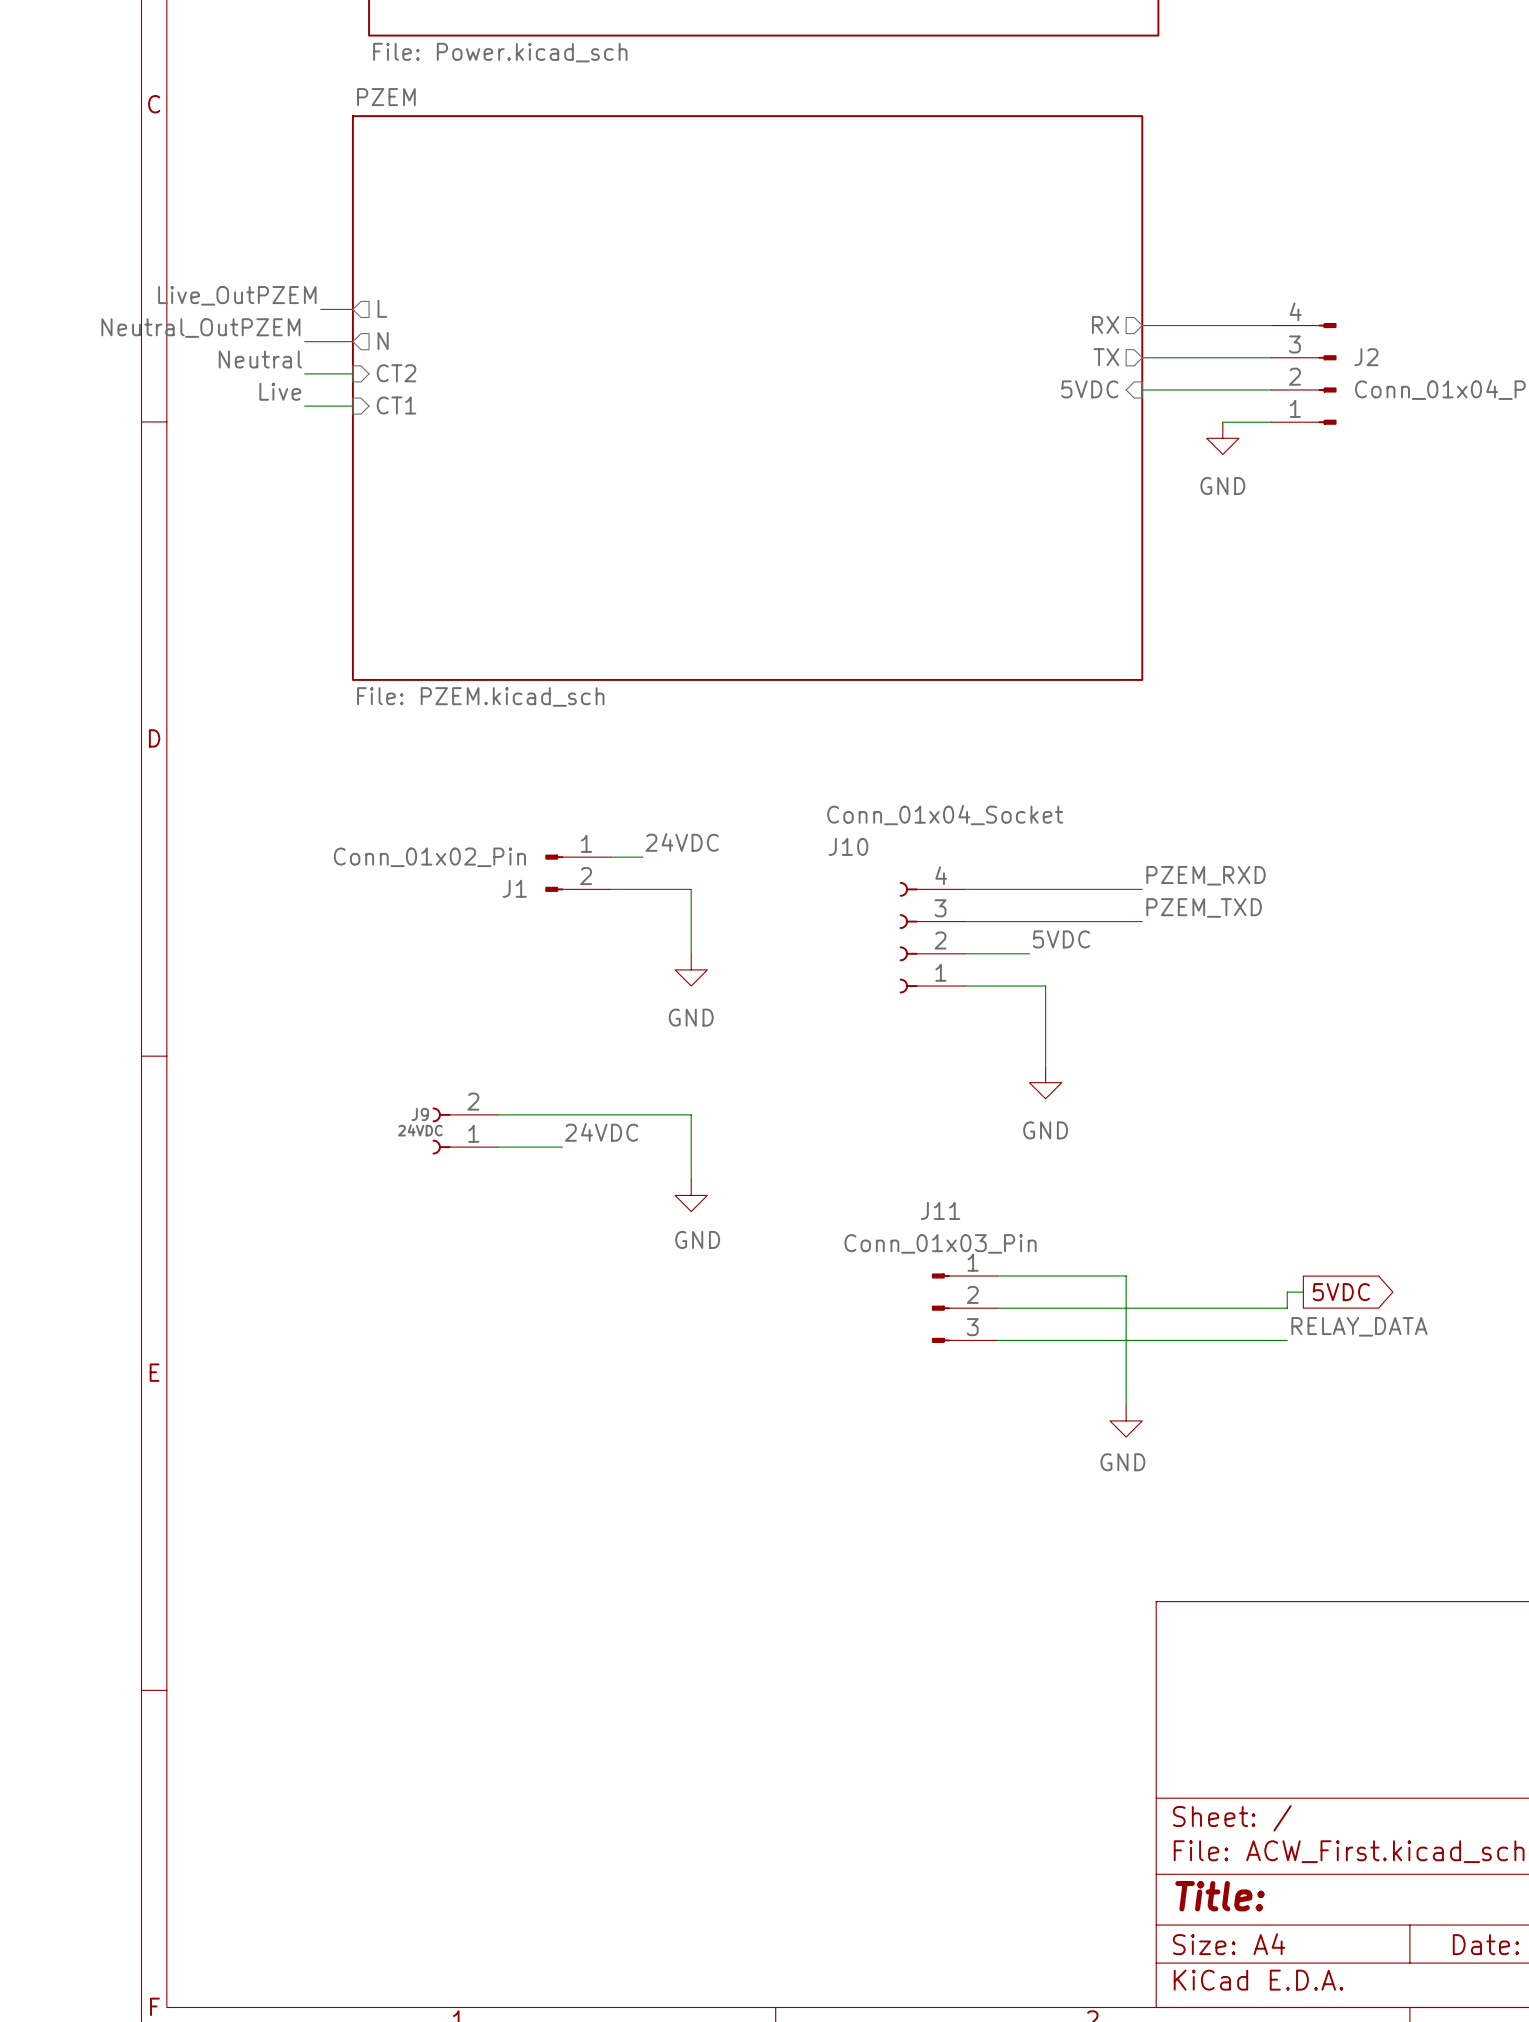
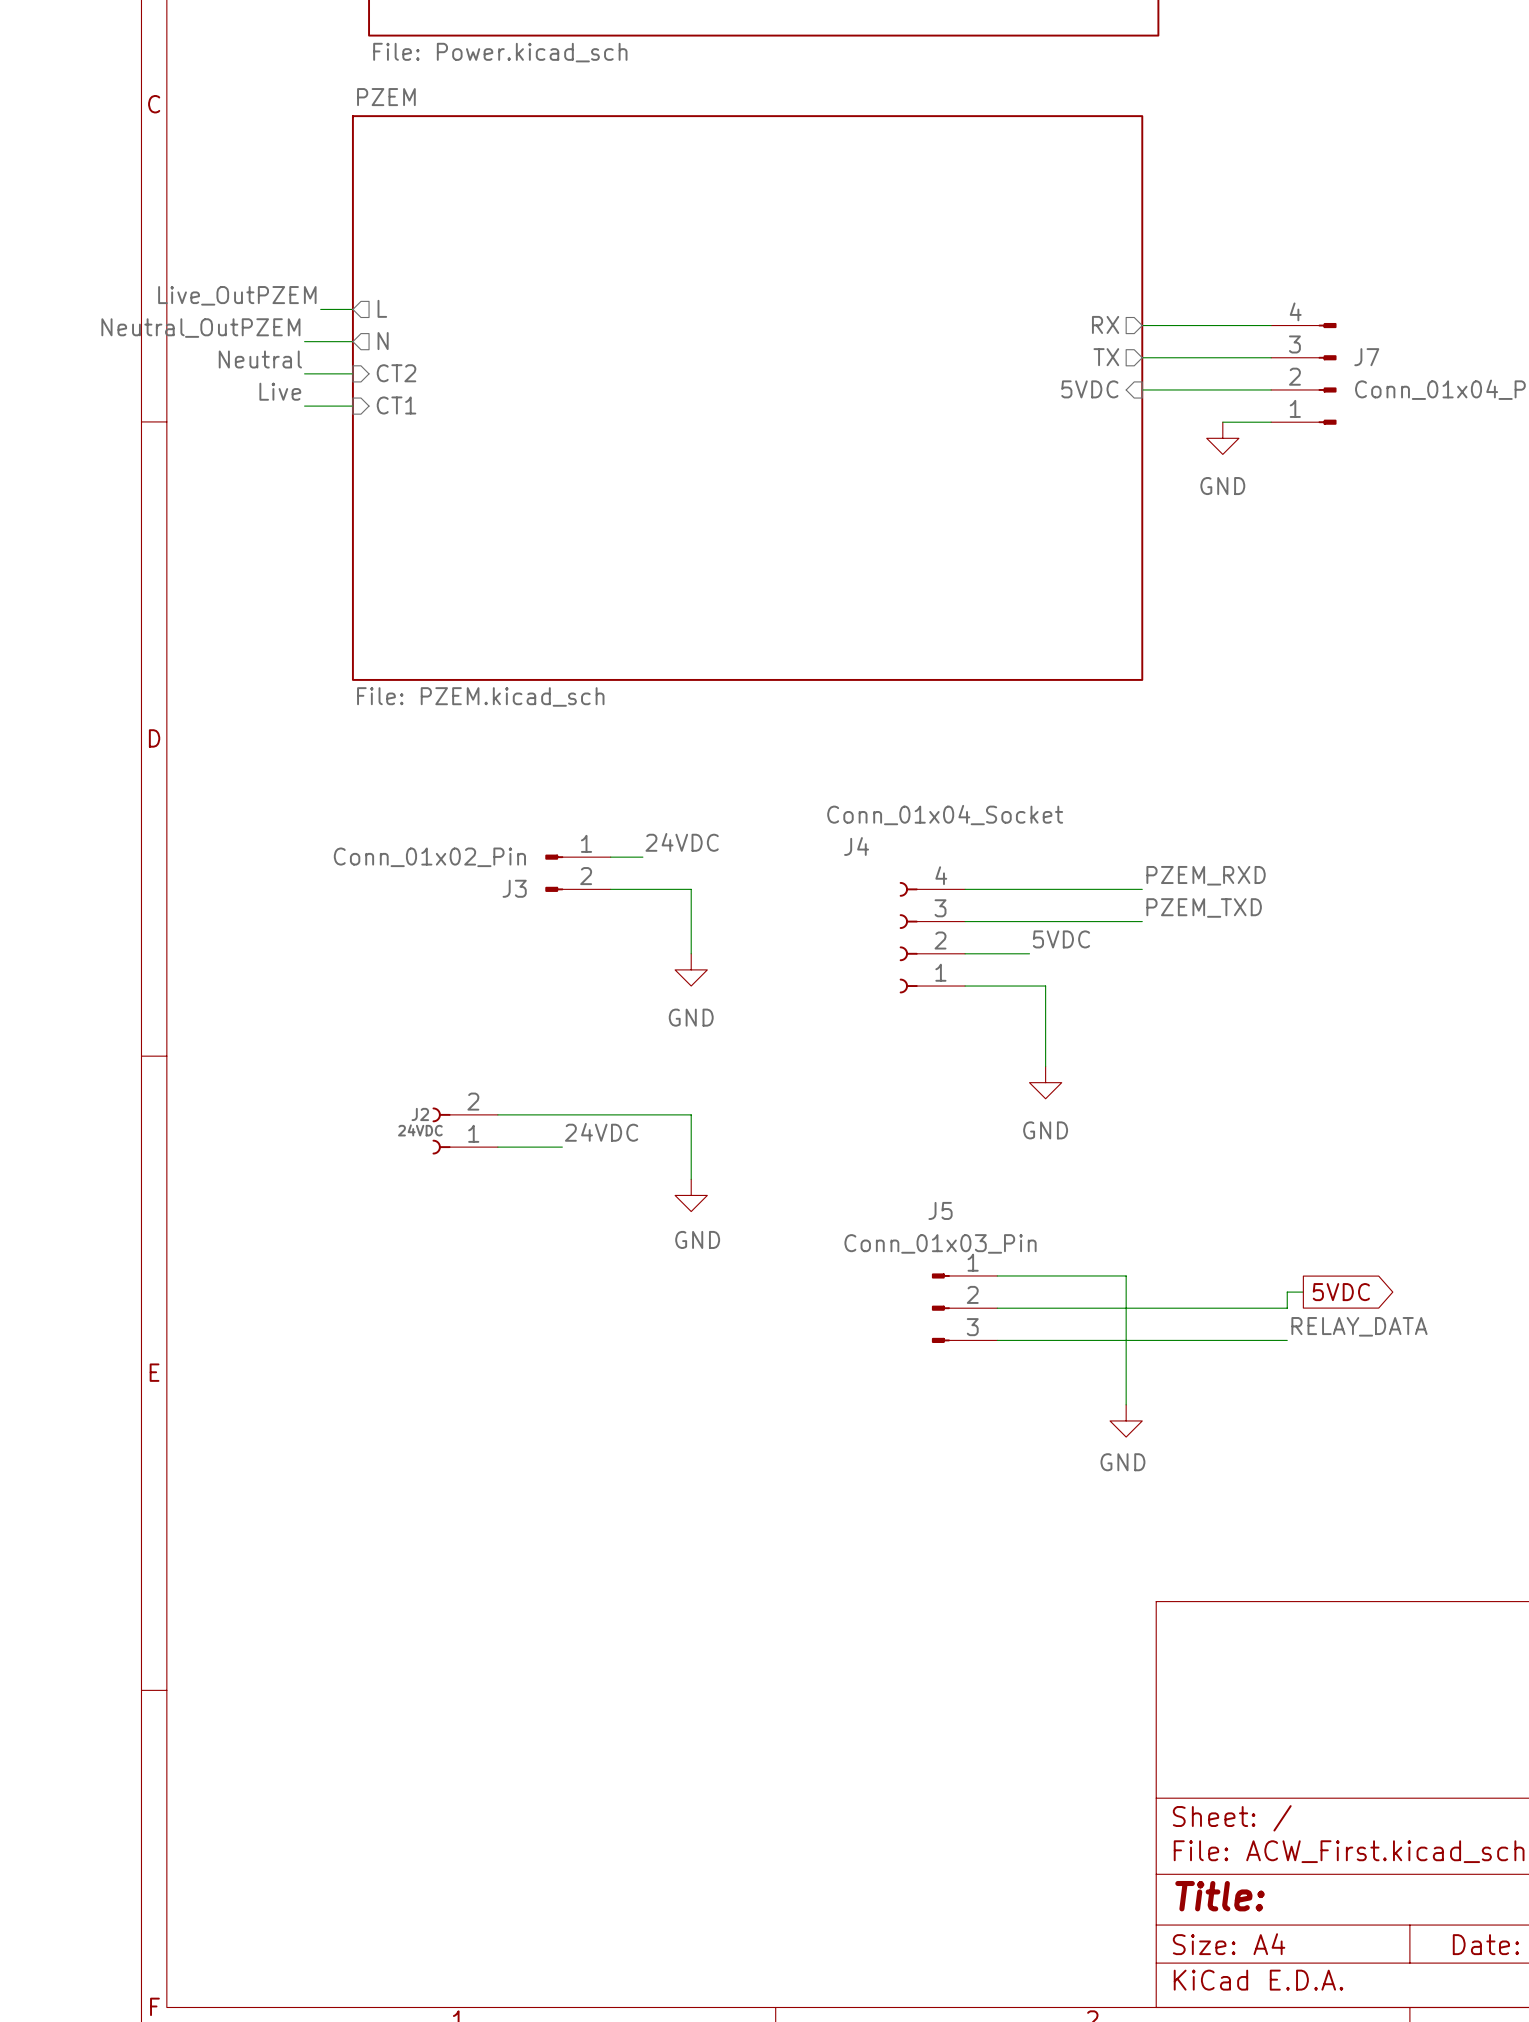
J2 name: J2 (1366, 357) -> J7 (1366, 357)
J10 name: J10 (848, 846) -> J4 (856, 846)
J1 name: J1 (514, 888) -> J3 (514, 888)
J9 name: J9 (420, 1114) -> J2 (420, 1114)
J11 name: J11 (940, 1210) -> J5 (940, 1210)

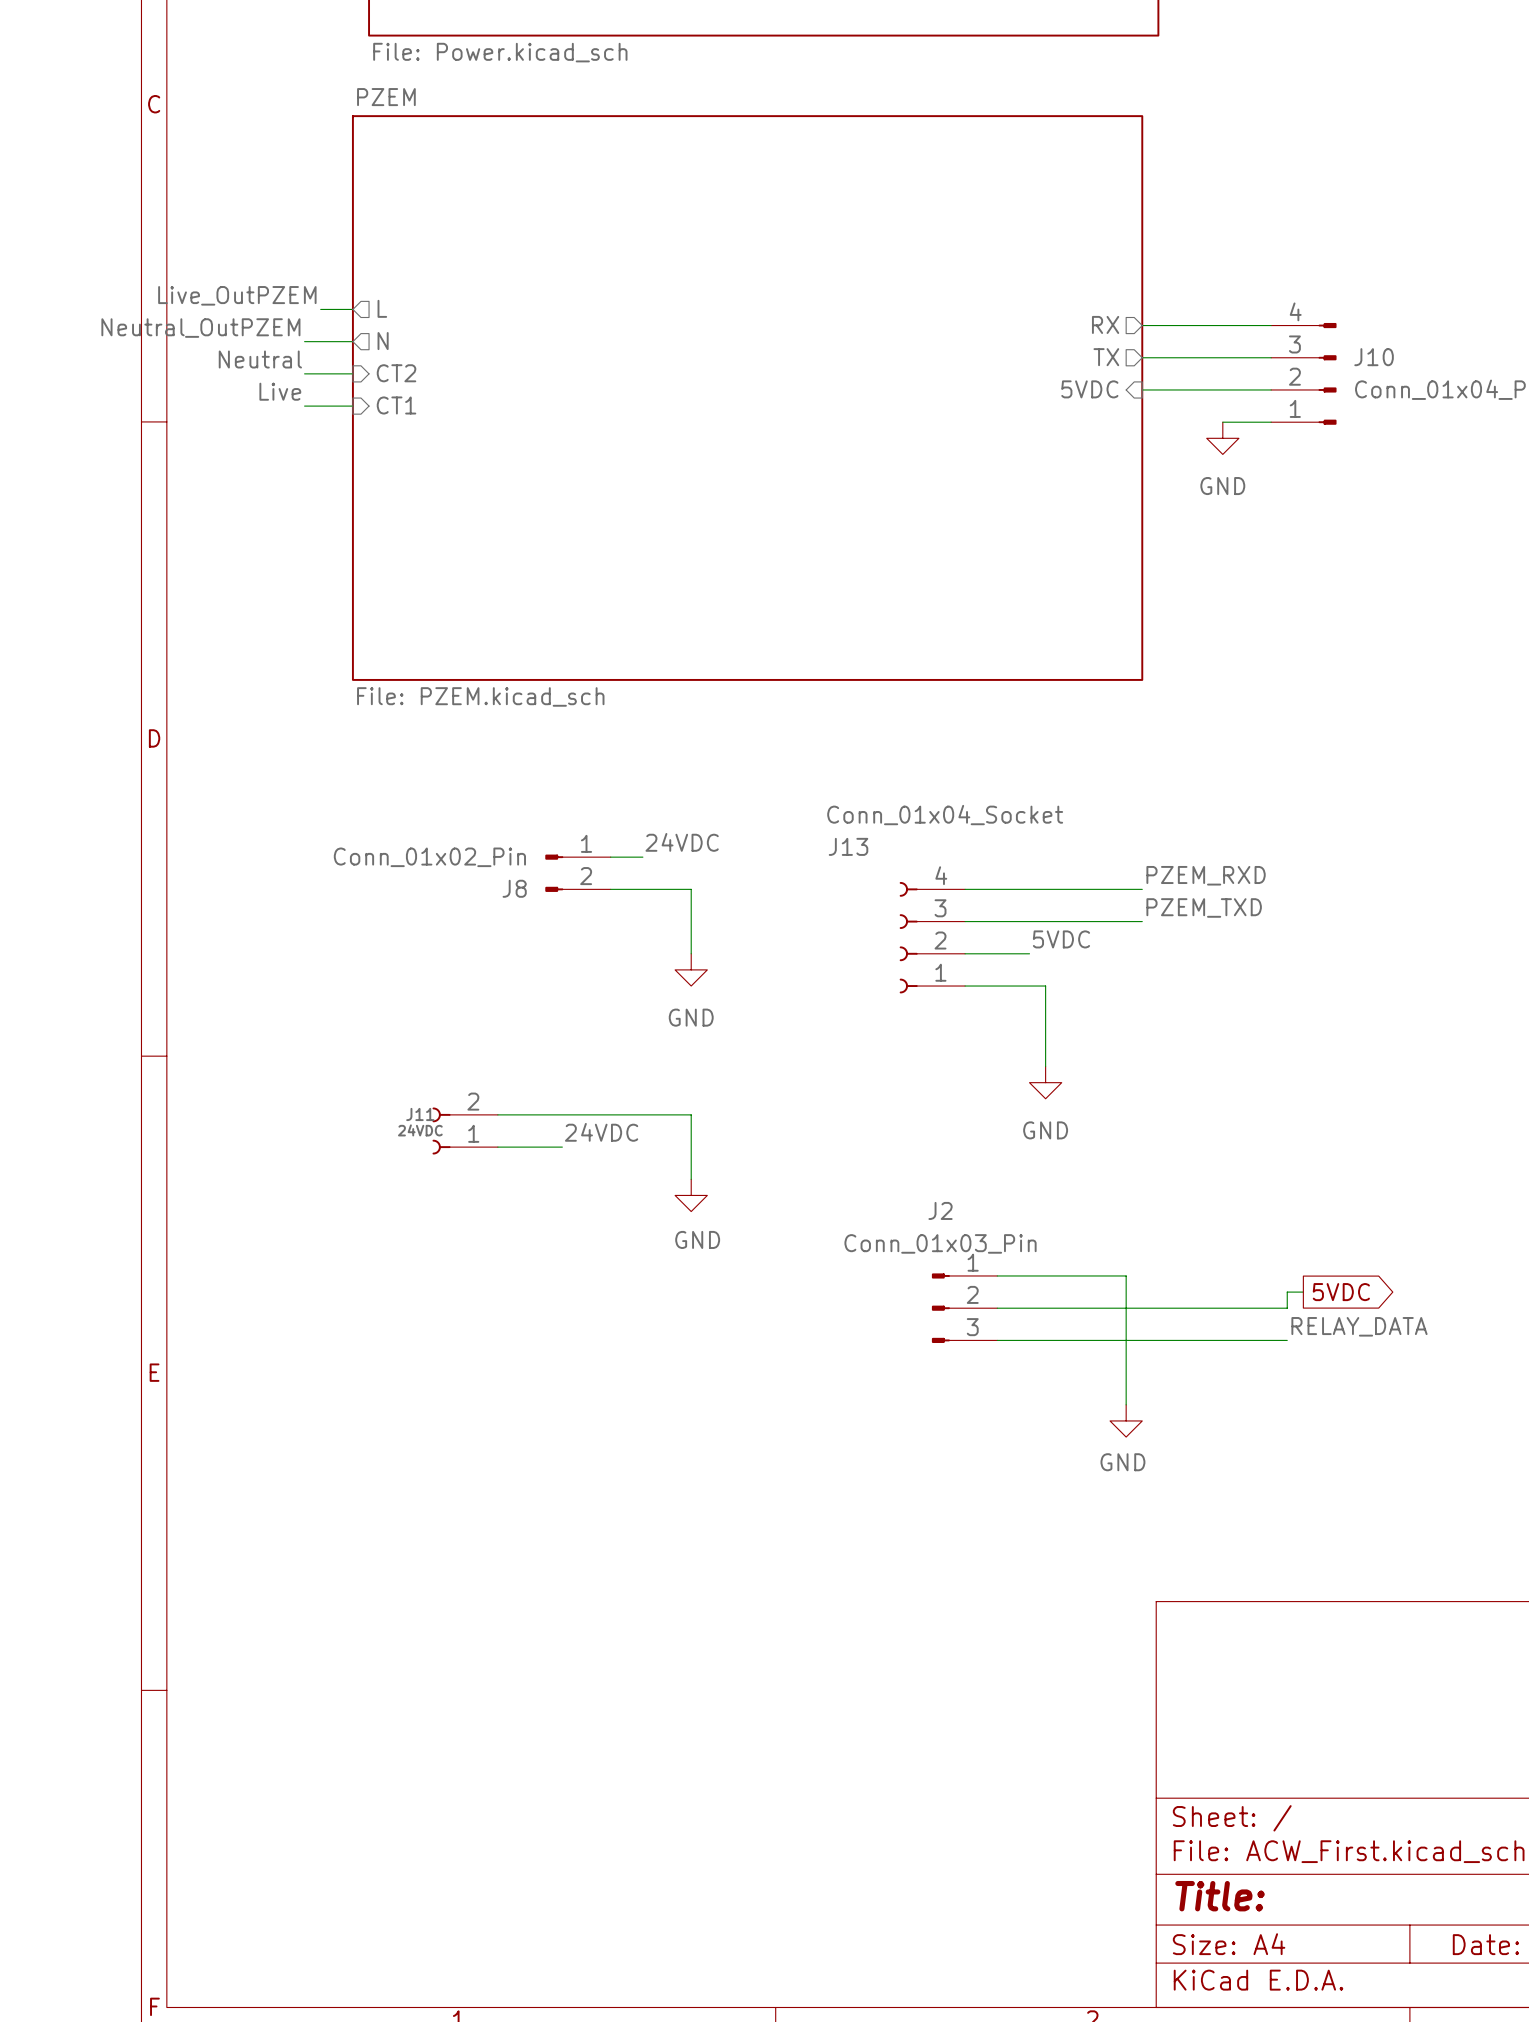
J7 name: J7 (1366, 357) -> J10 (1374, 357)
J4 name: J4 (856, 846) -> J13 (848, 846)
J3 name: J3 (514, 888) -> J8 (514, 888)
J2 name: J2 (420, 1114) -> J11 (420, 1114)
J5 name: J5 (940, 1210) -> J2 (940, 1210)

